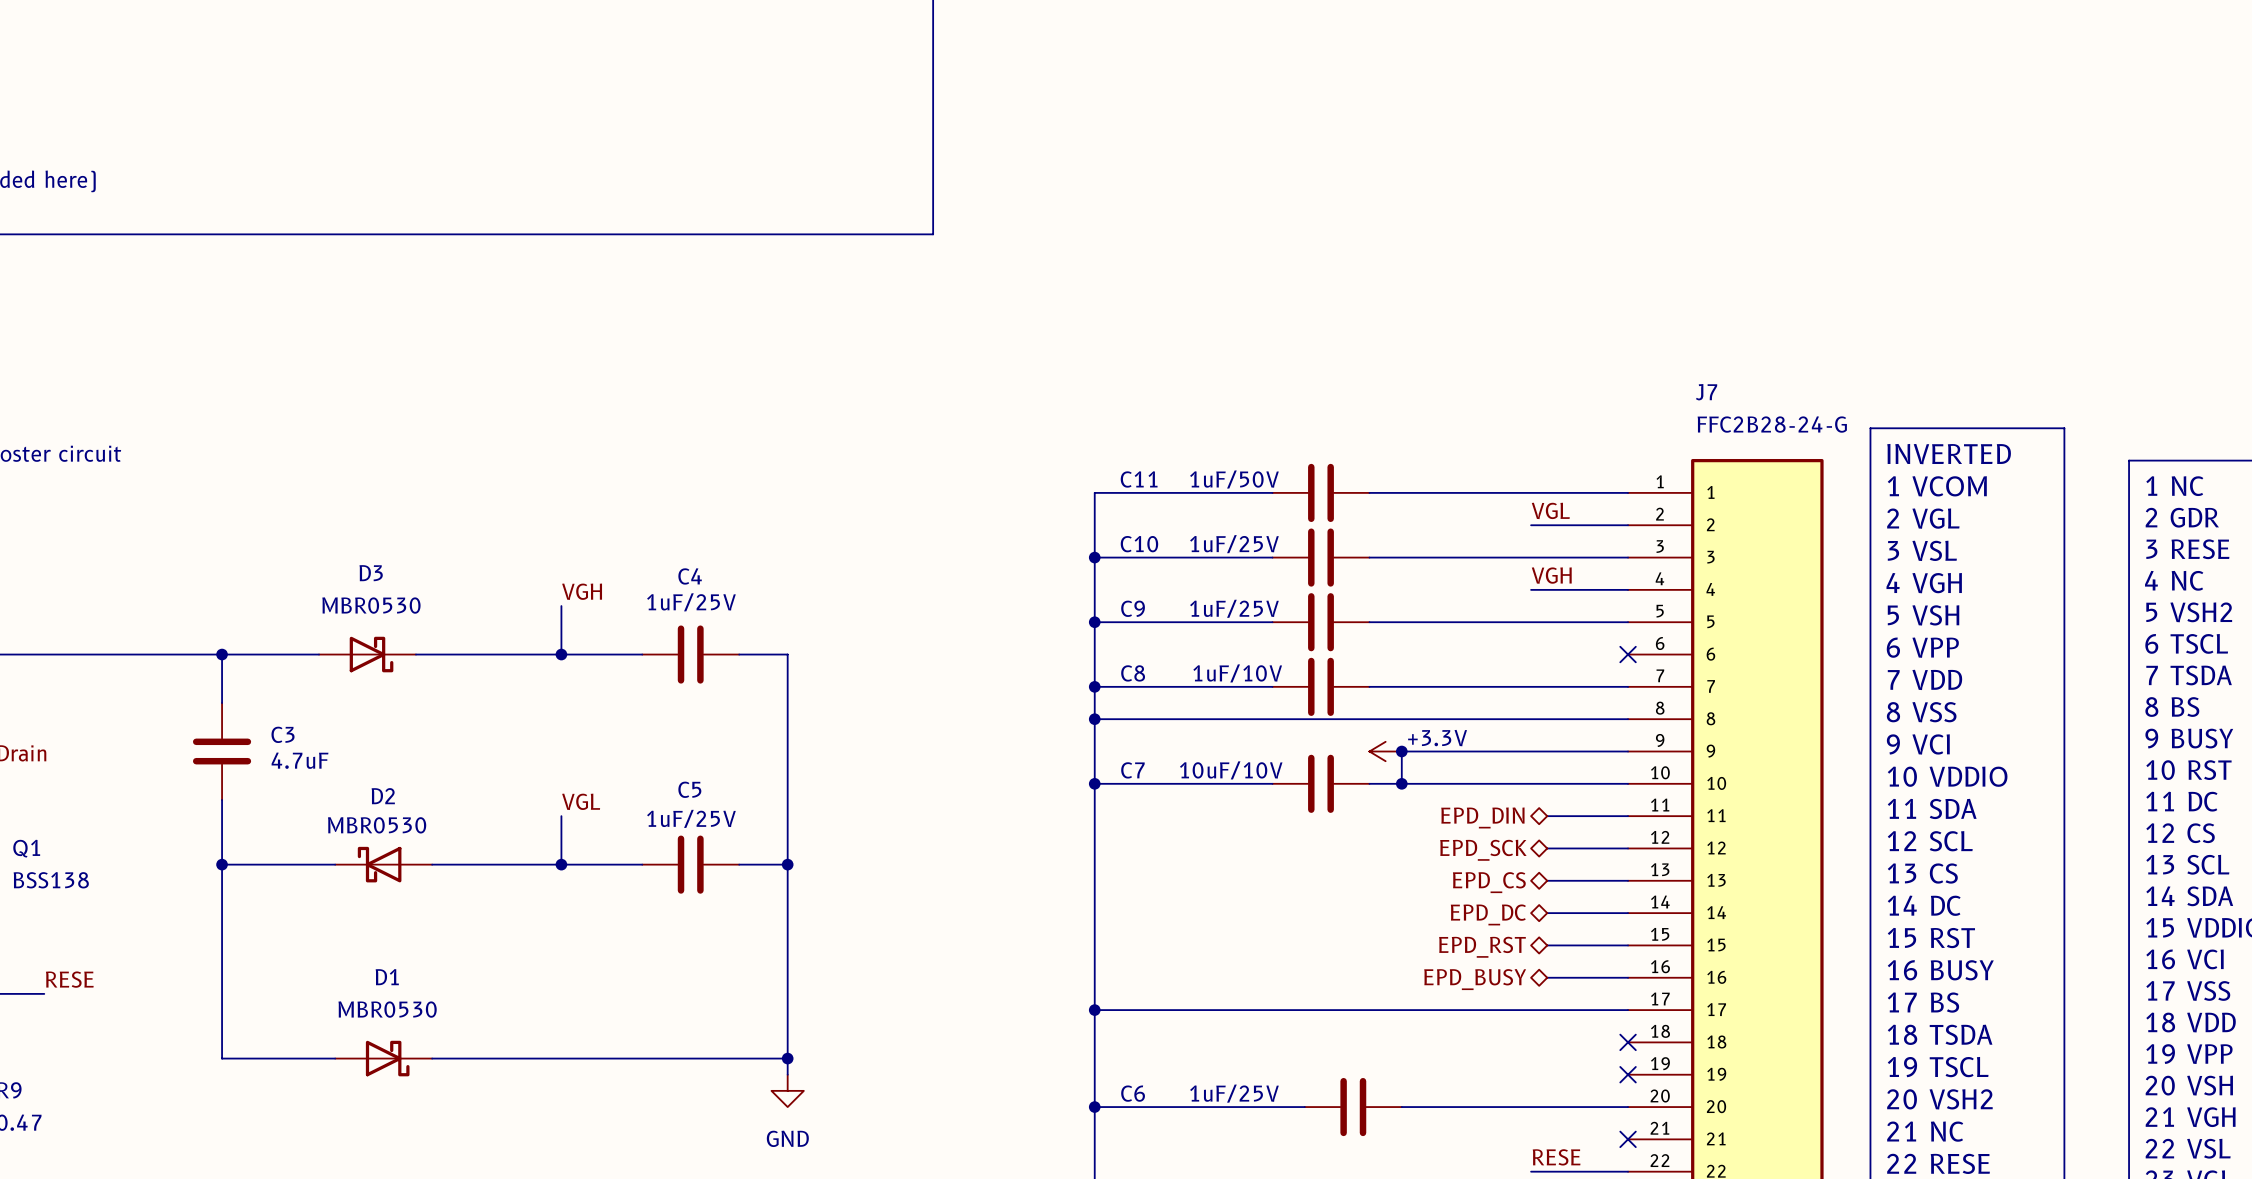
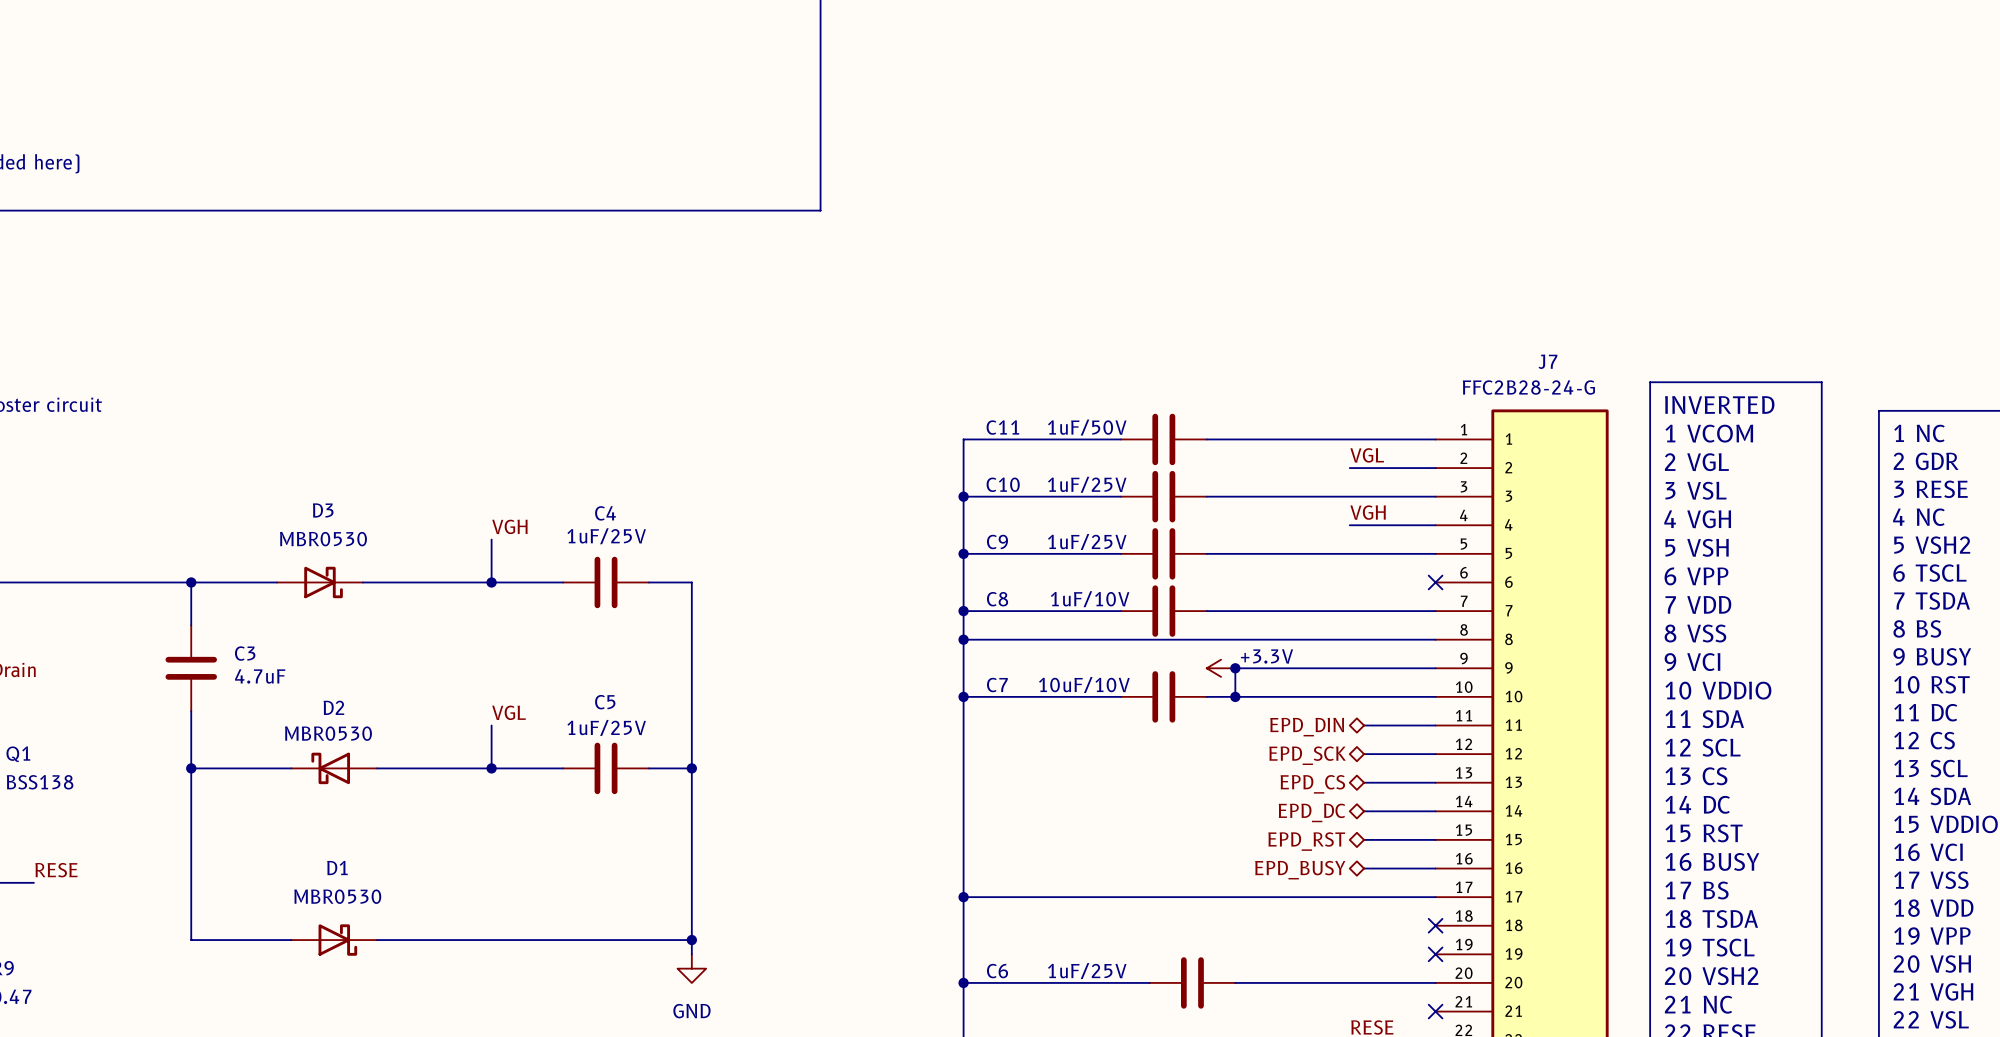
J7 name position: J7 (1706, 392) -> J7 (1547, 361)
J7 value position: FFC2B28-24-G (1772, 424) -> FFC2B28-24-G (1528, 387)

